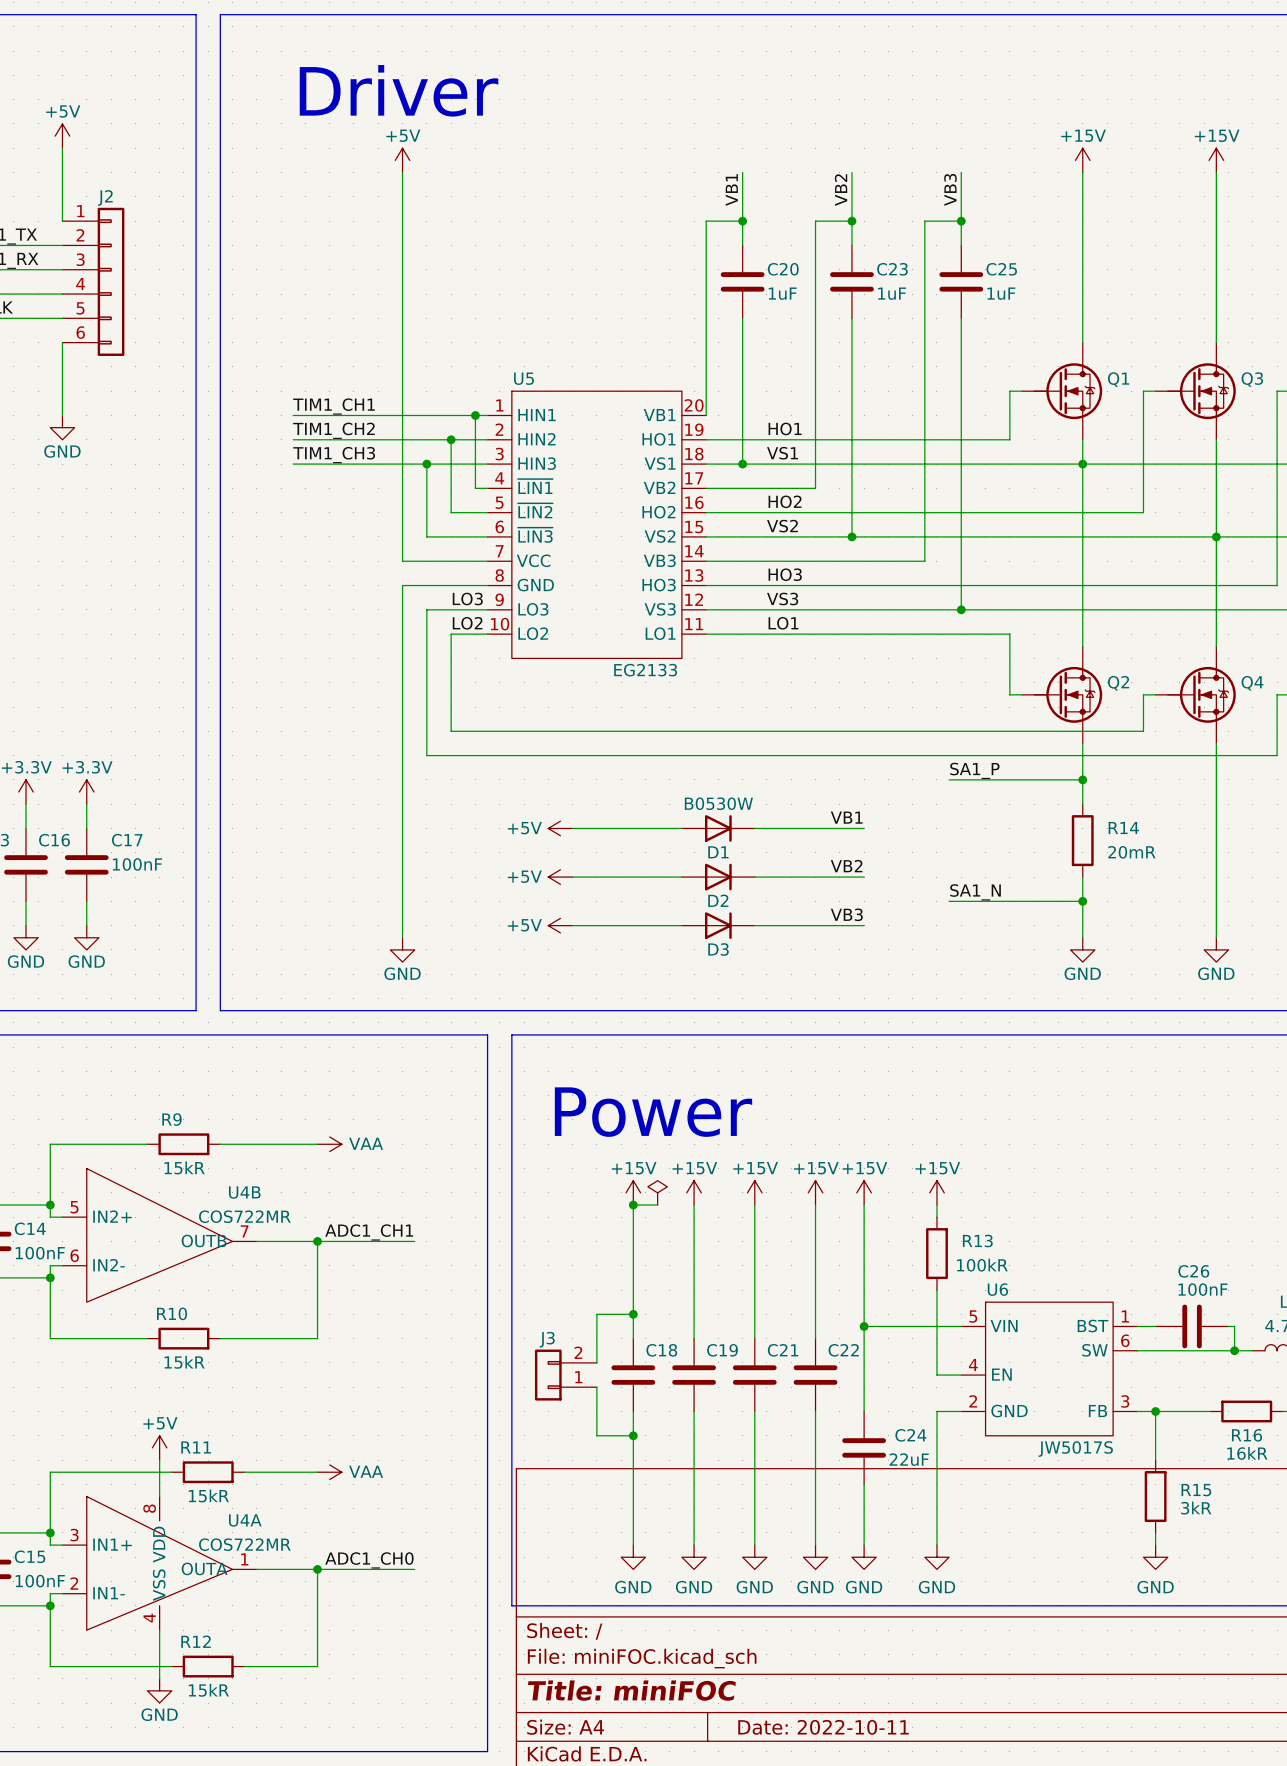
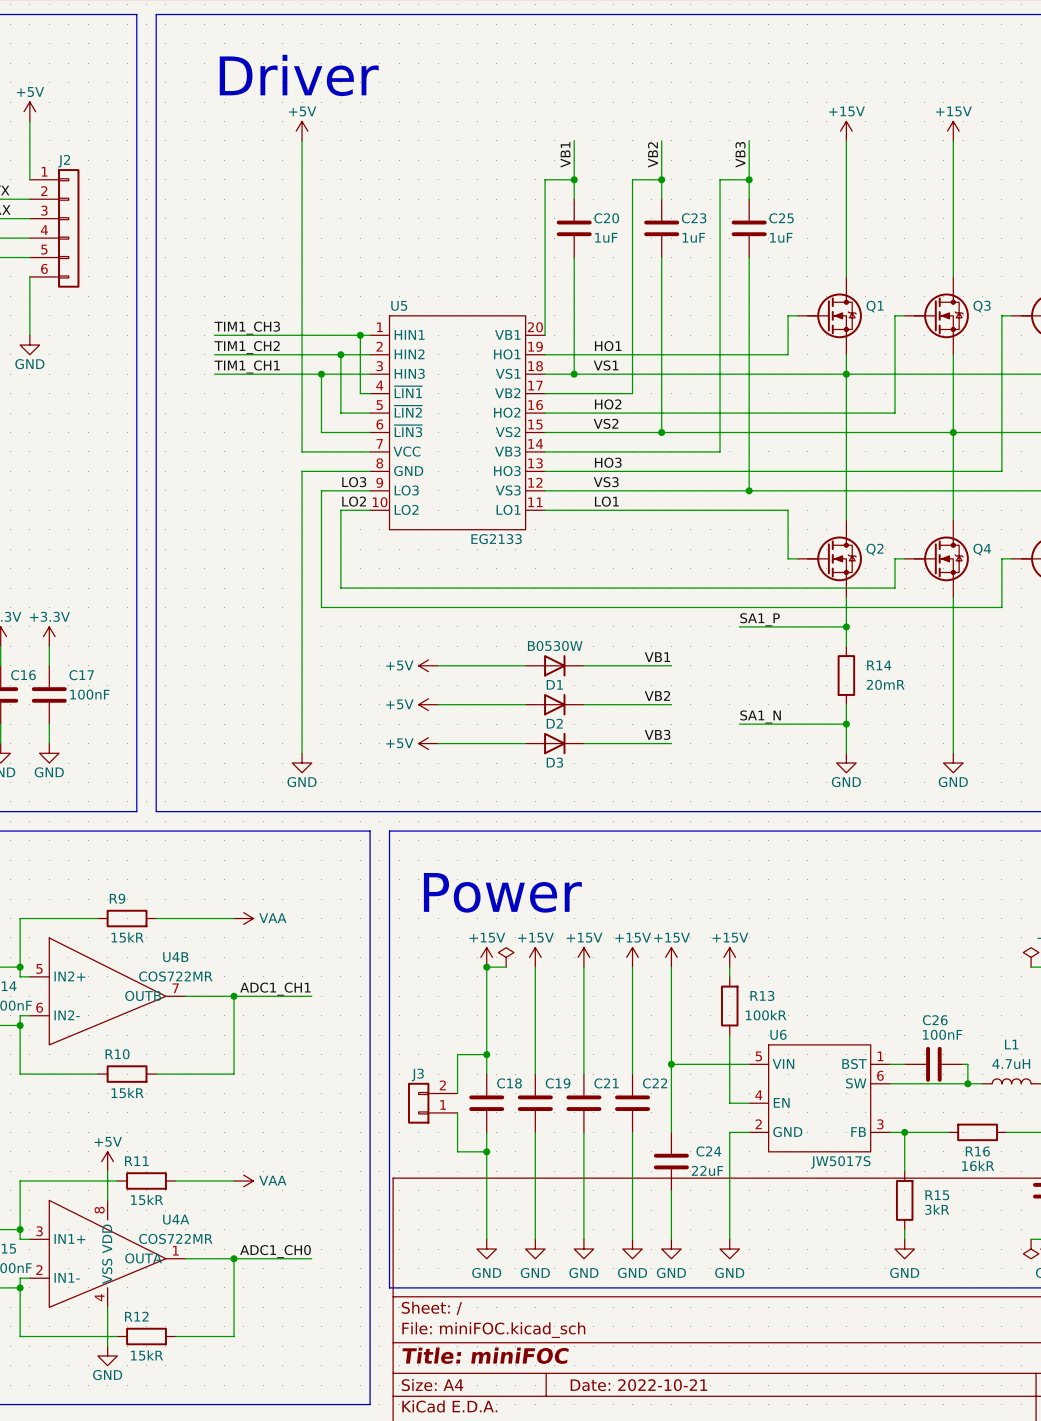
label: TIM1_CH1 (334, 406) -> TIM1_CH3 (247, 328)
label: TIM1_CH3 (334, 455) -> TIM1_CH1 (247, 366)
title block: Date: 2022-10-11 (823, 1727) -> Date: 2022-10-21 (638, 1385)

